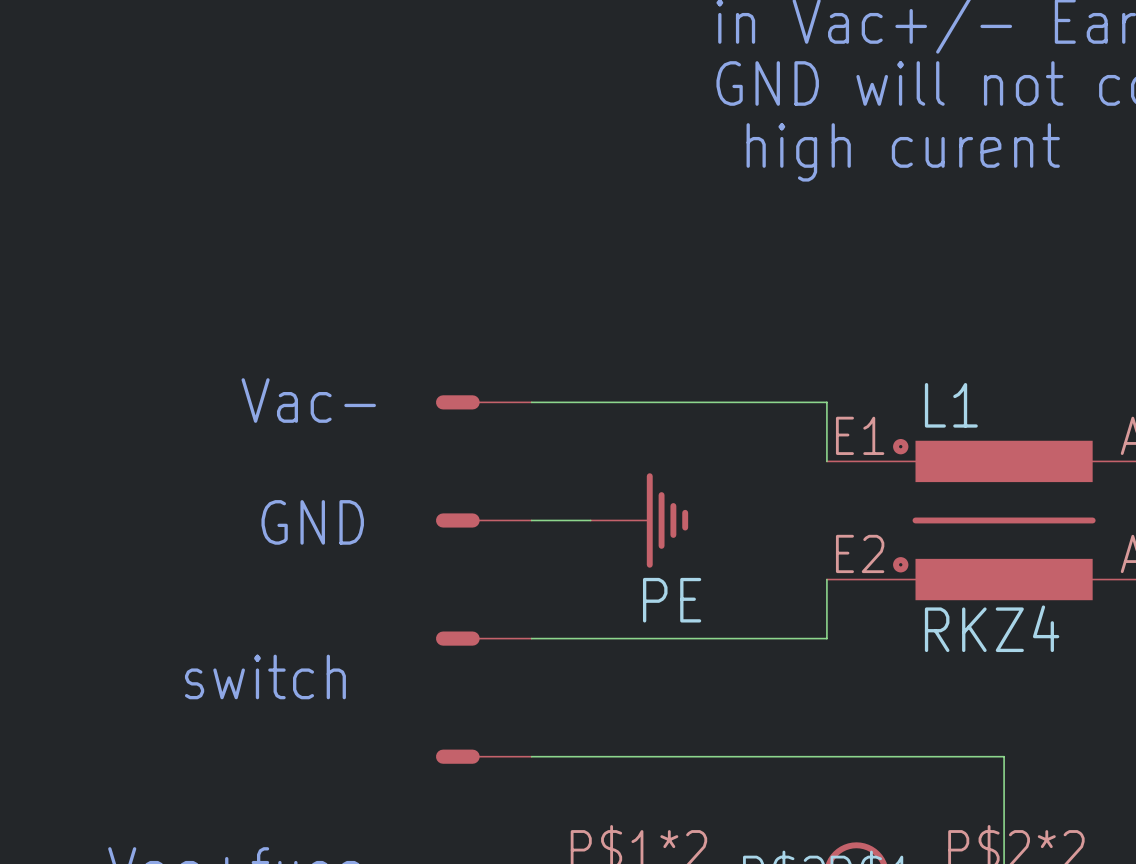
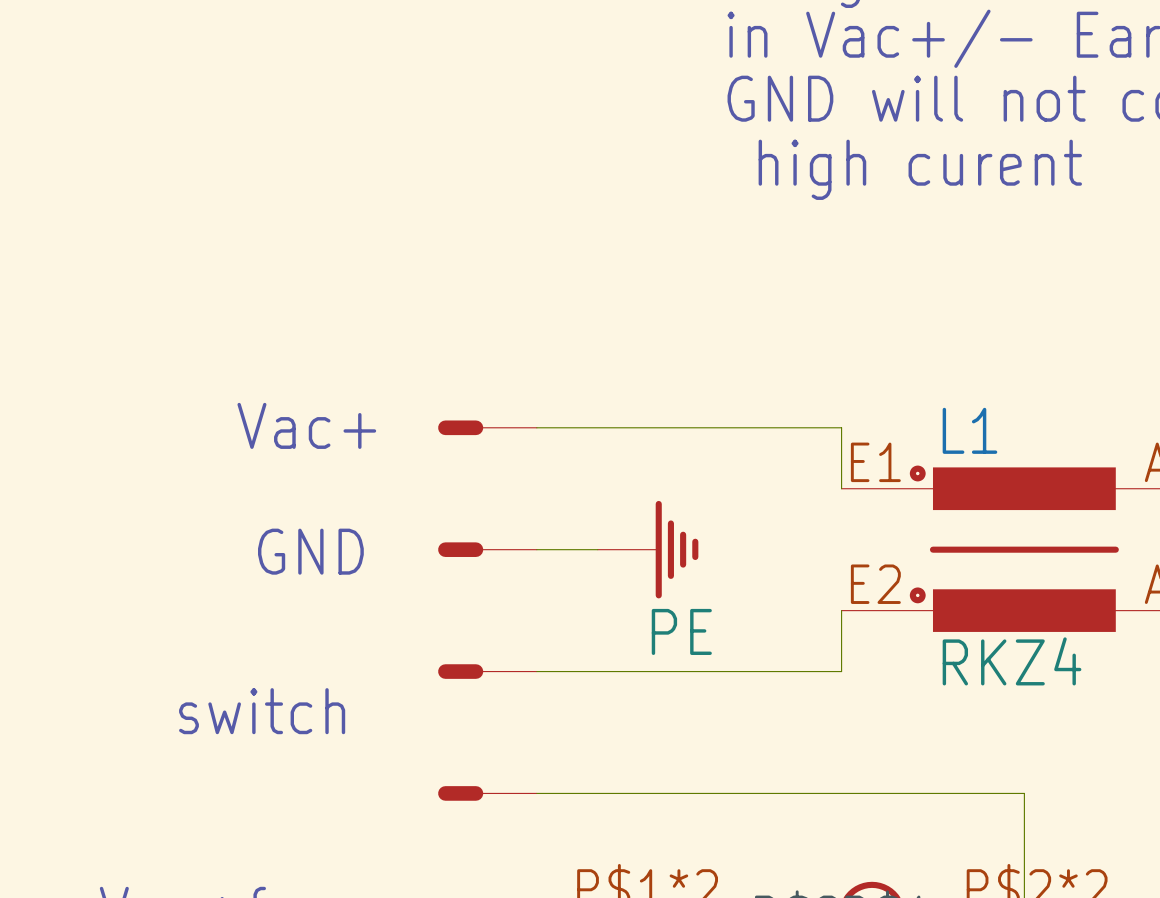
text: Vac- (308, 400) -> Vac+ (306, 425)

